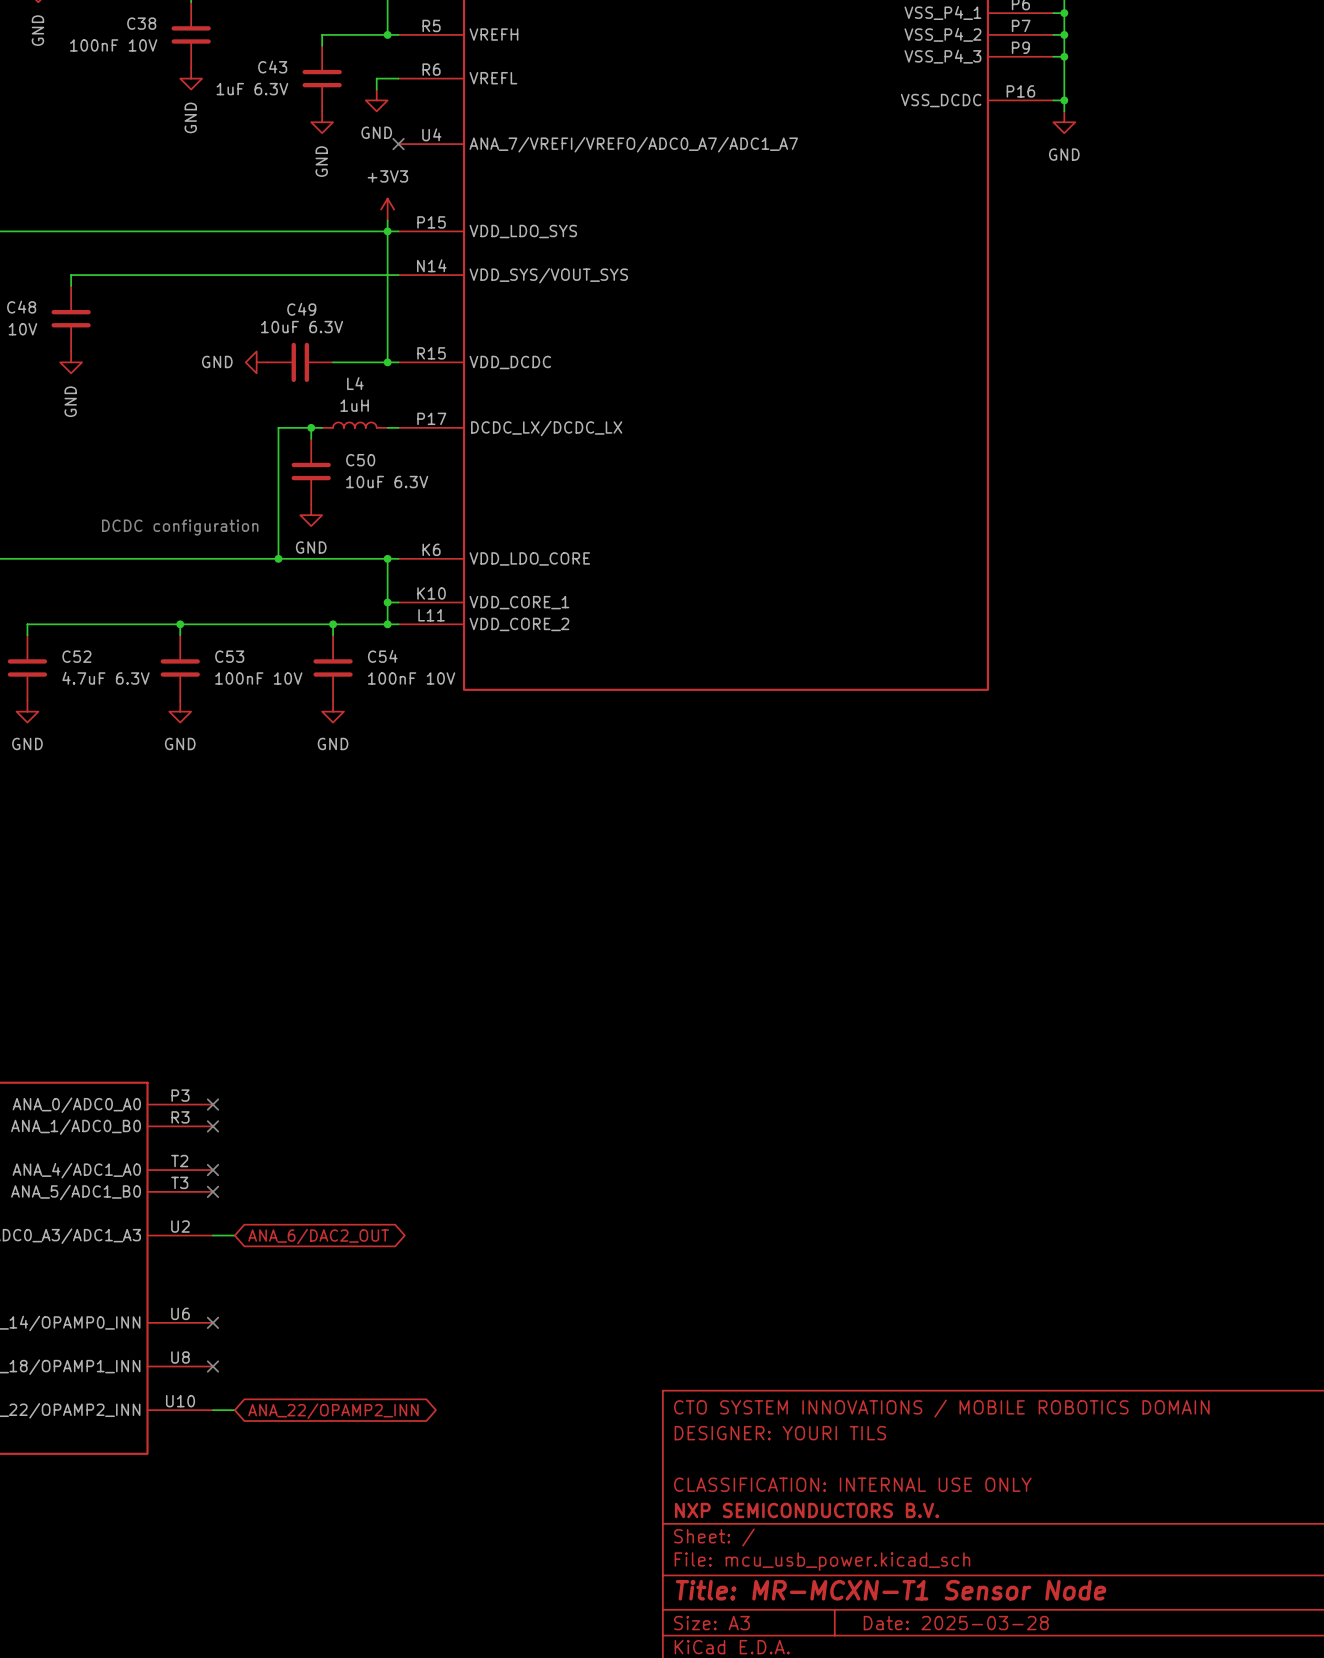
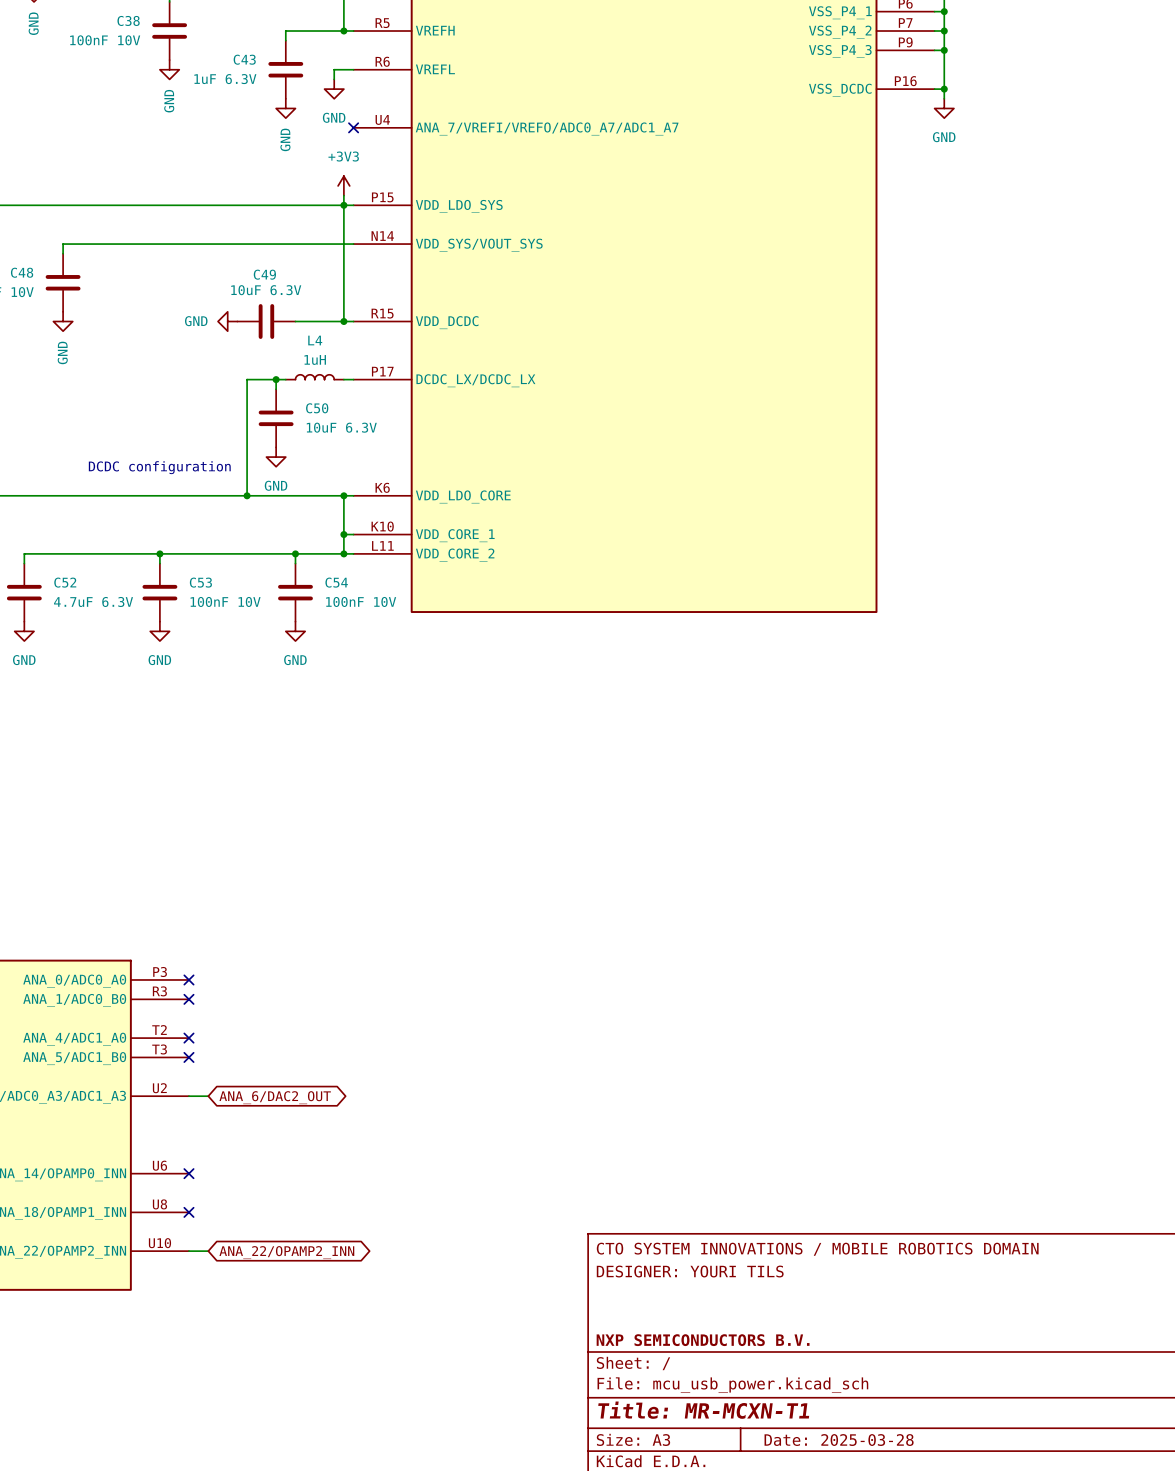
title block: CLASSIFICATION: INTERNAL USE ONLY (852, 1484) -> none
title block: Title: MR-MCXN-T1 Sensor Node (891, 1590) -> Title: MR-MCXN-T1 (703, 1410)

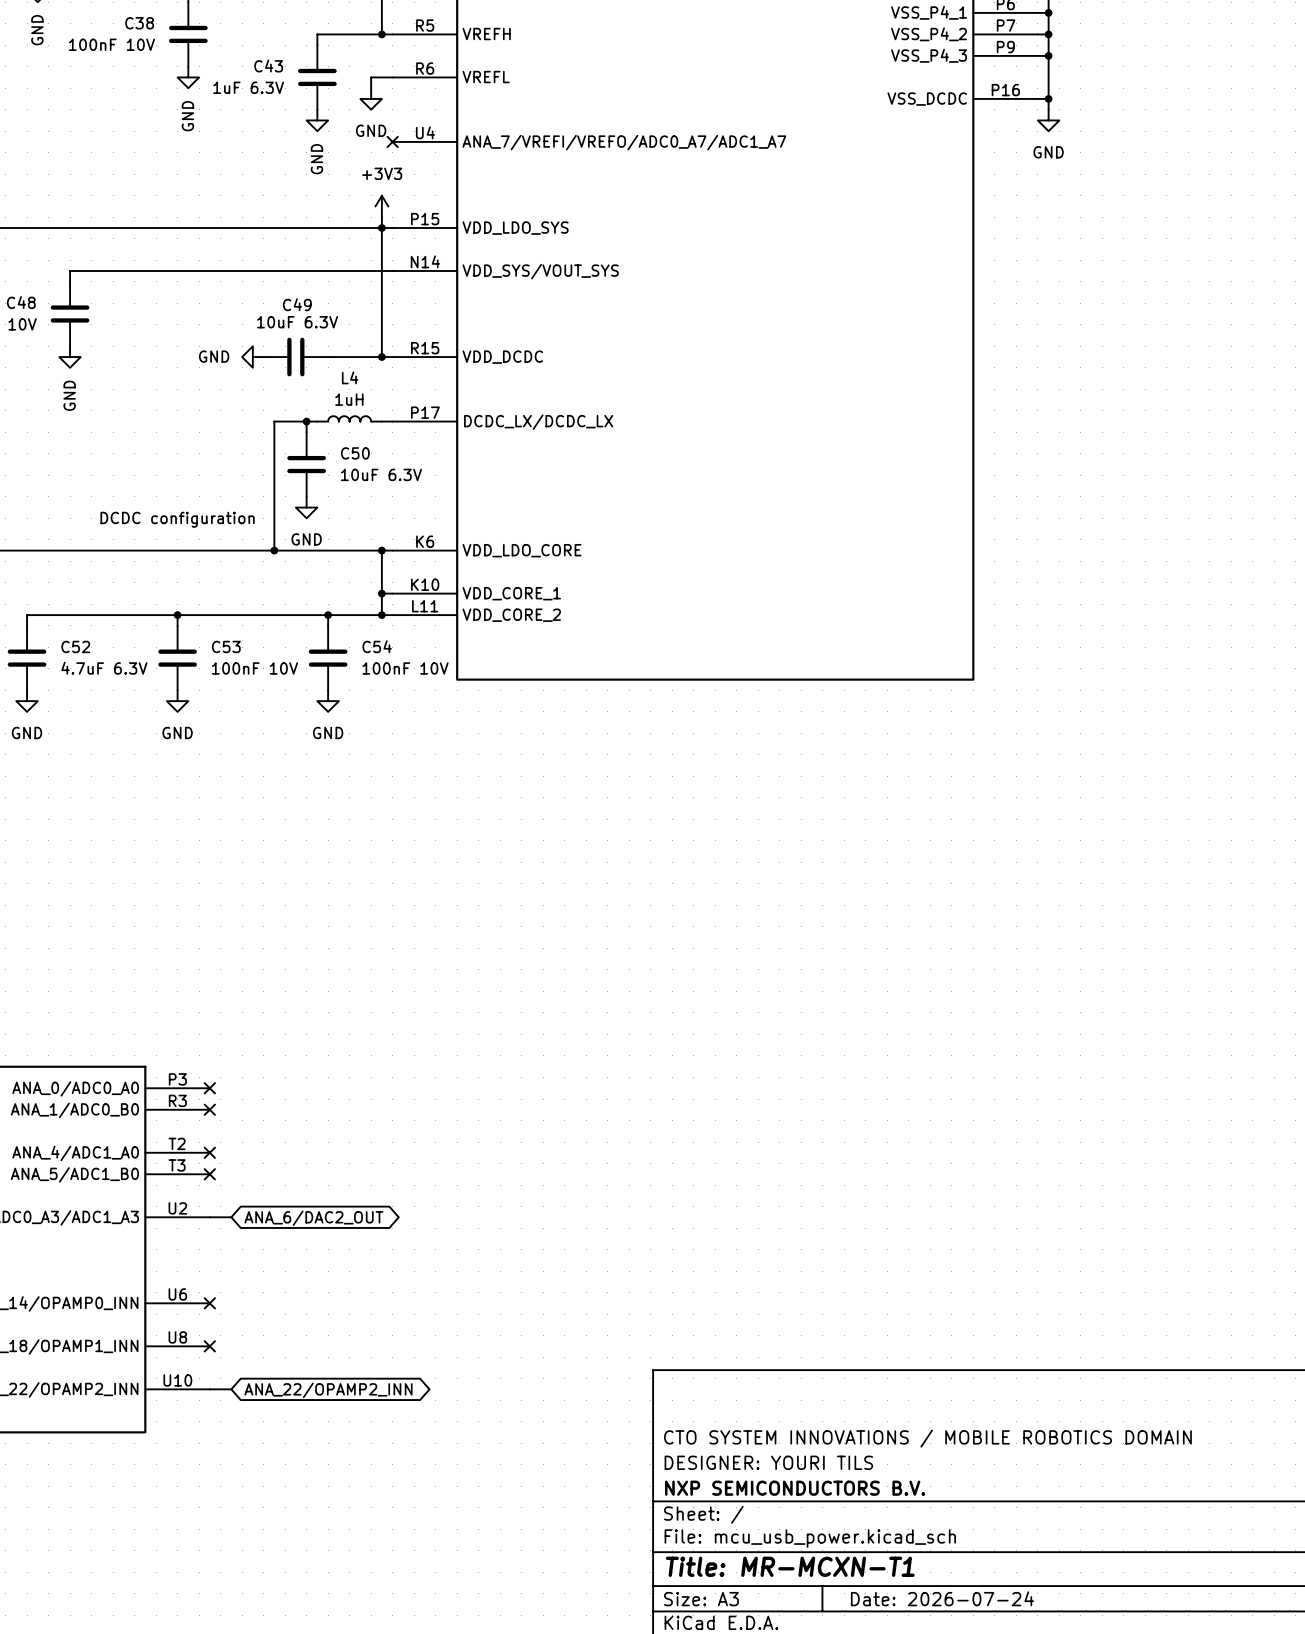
title block position: CTO SYSTEM INNOVATIONS / MOBILE ROBOTICS DOMAIN (817, 1249) -> CTO SYSTEM INNOVATIONS / MOBILE ROBOTICS DOMAIN (927, 1438)
title block position: DESIGNER: YOURI TILS (690, 1271) -> DESIGNER: YOURI TILS (768, 1462)
title block: Date: 2025-03-28 (839, 1440) -> Date: 2026-07-24 (942, 1598)

